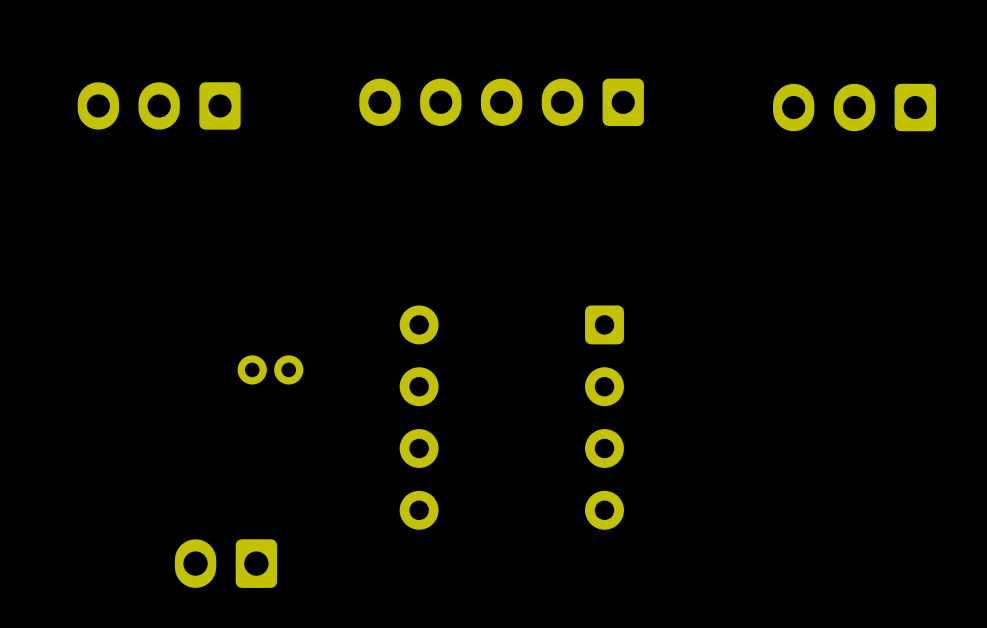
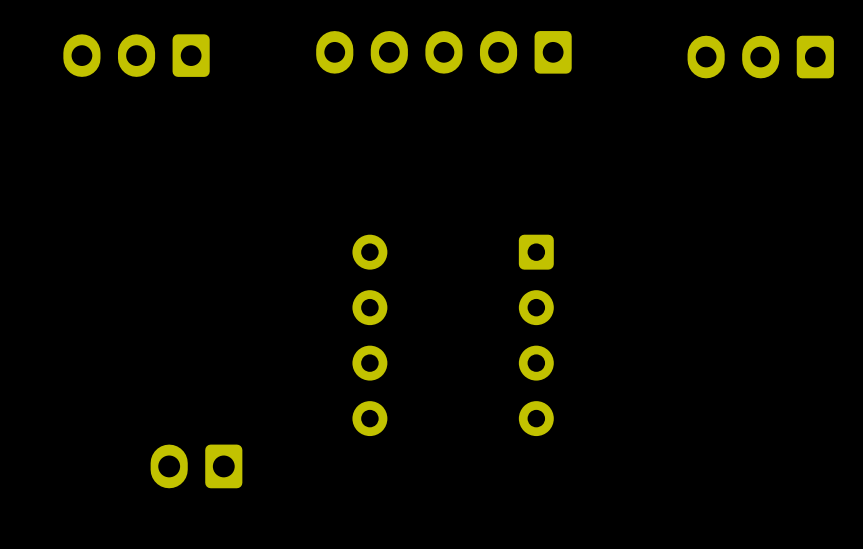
part: (270, 369) -> none

